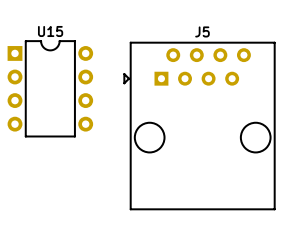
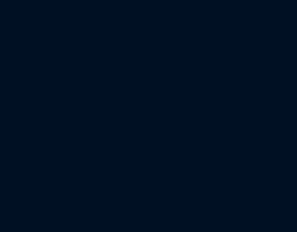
U15: (50, 88) -> none
J5: (199, 126) -> none

